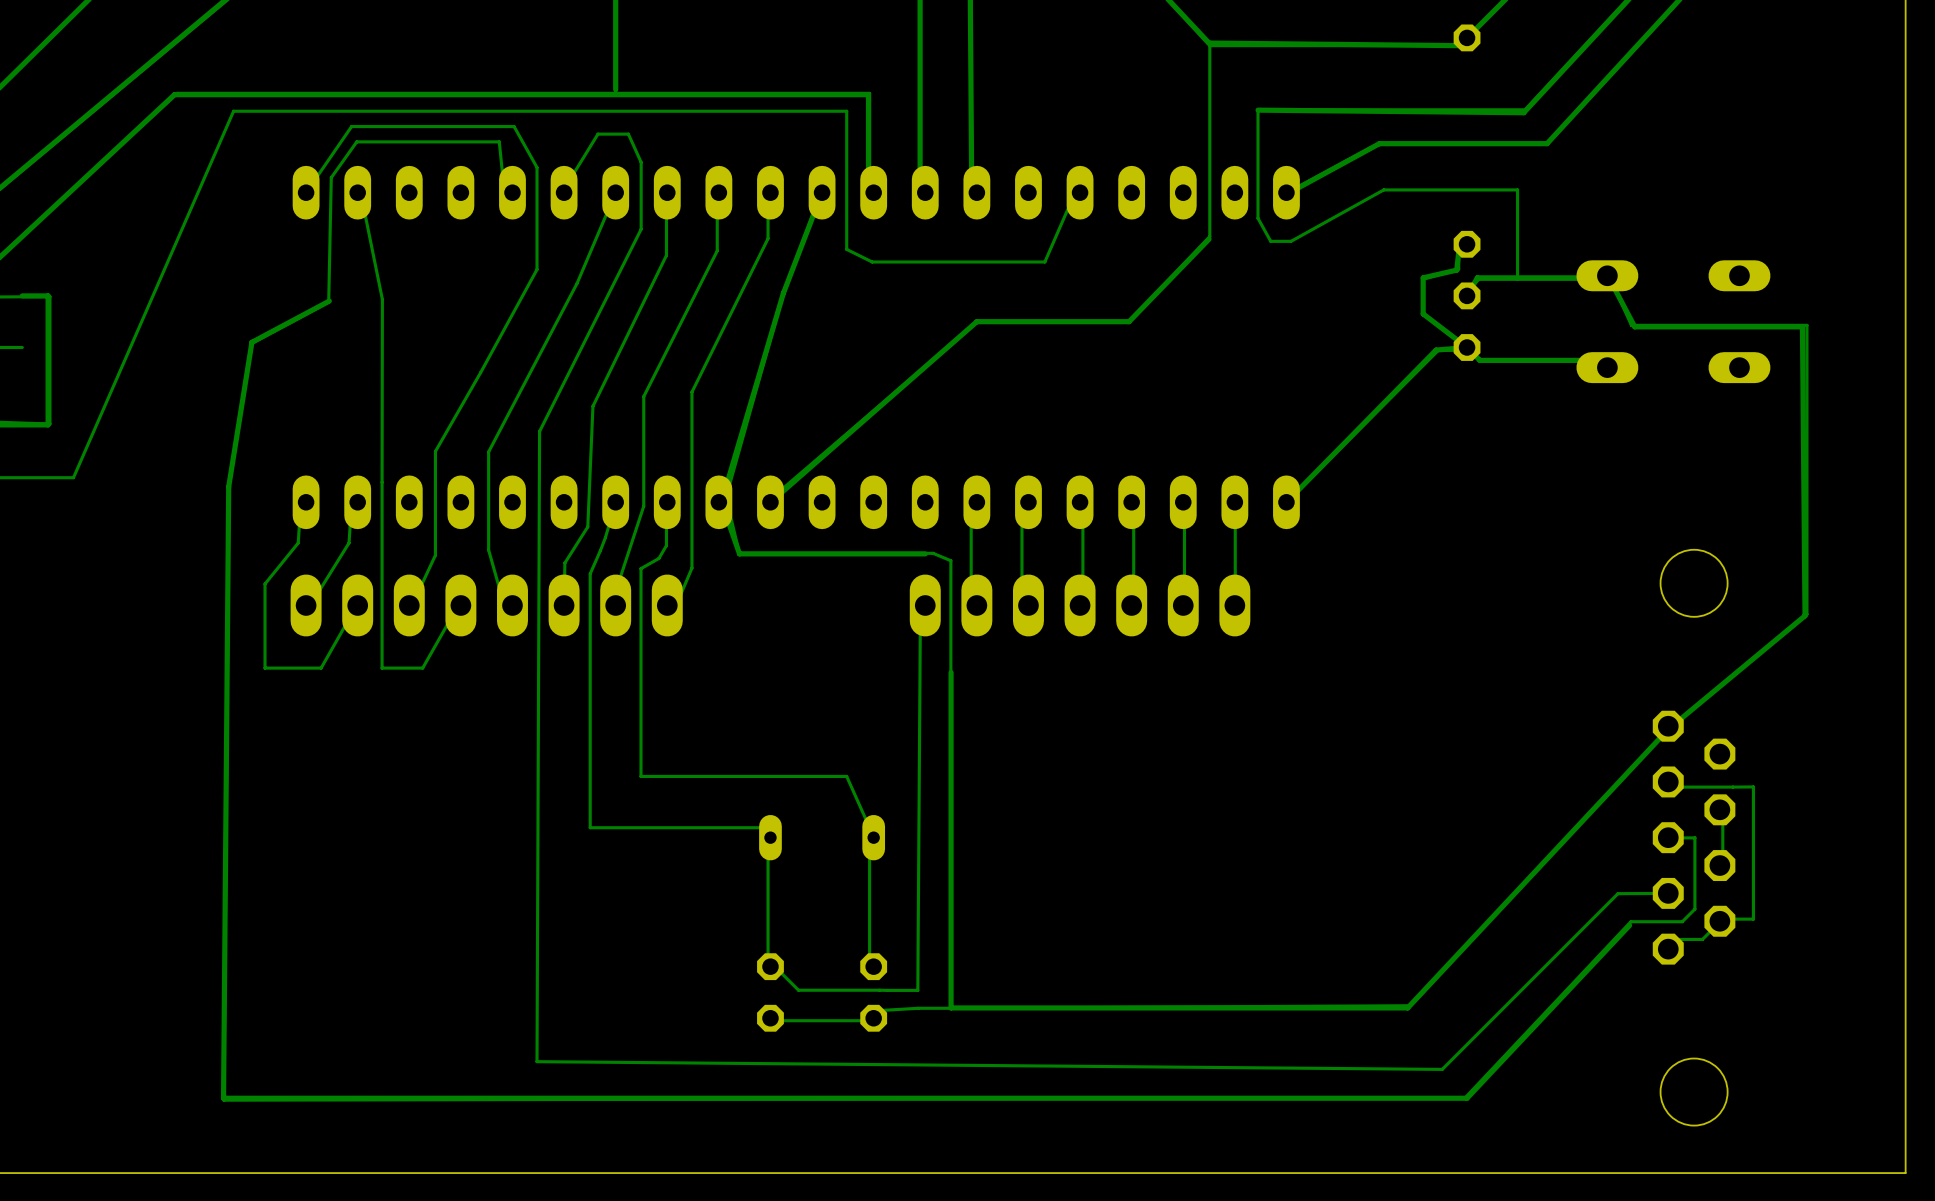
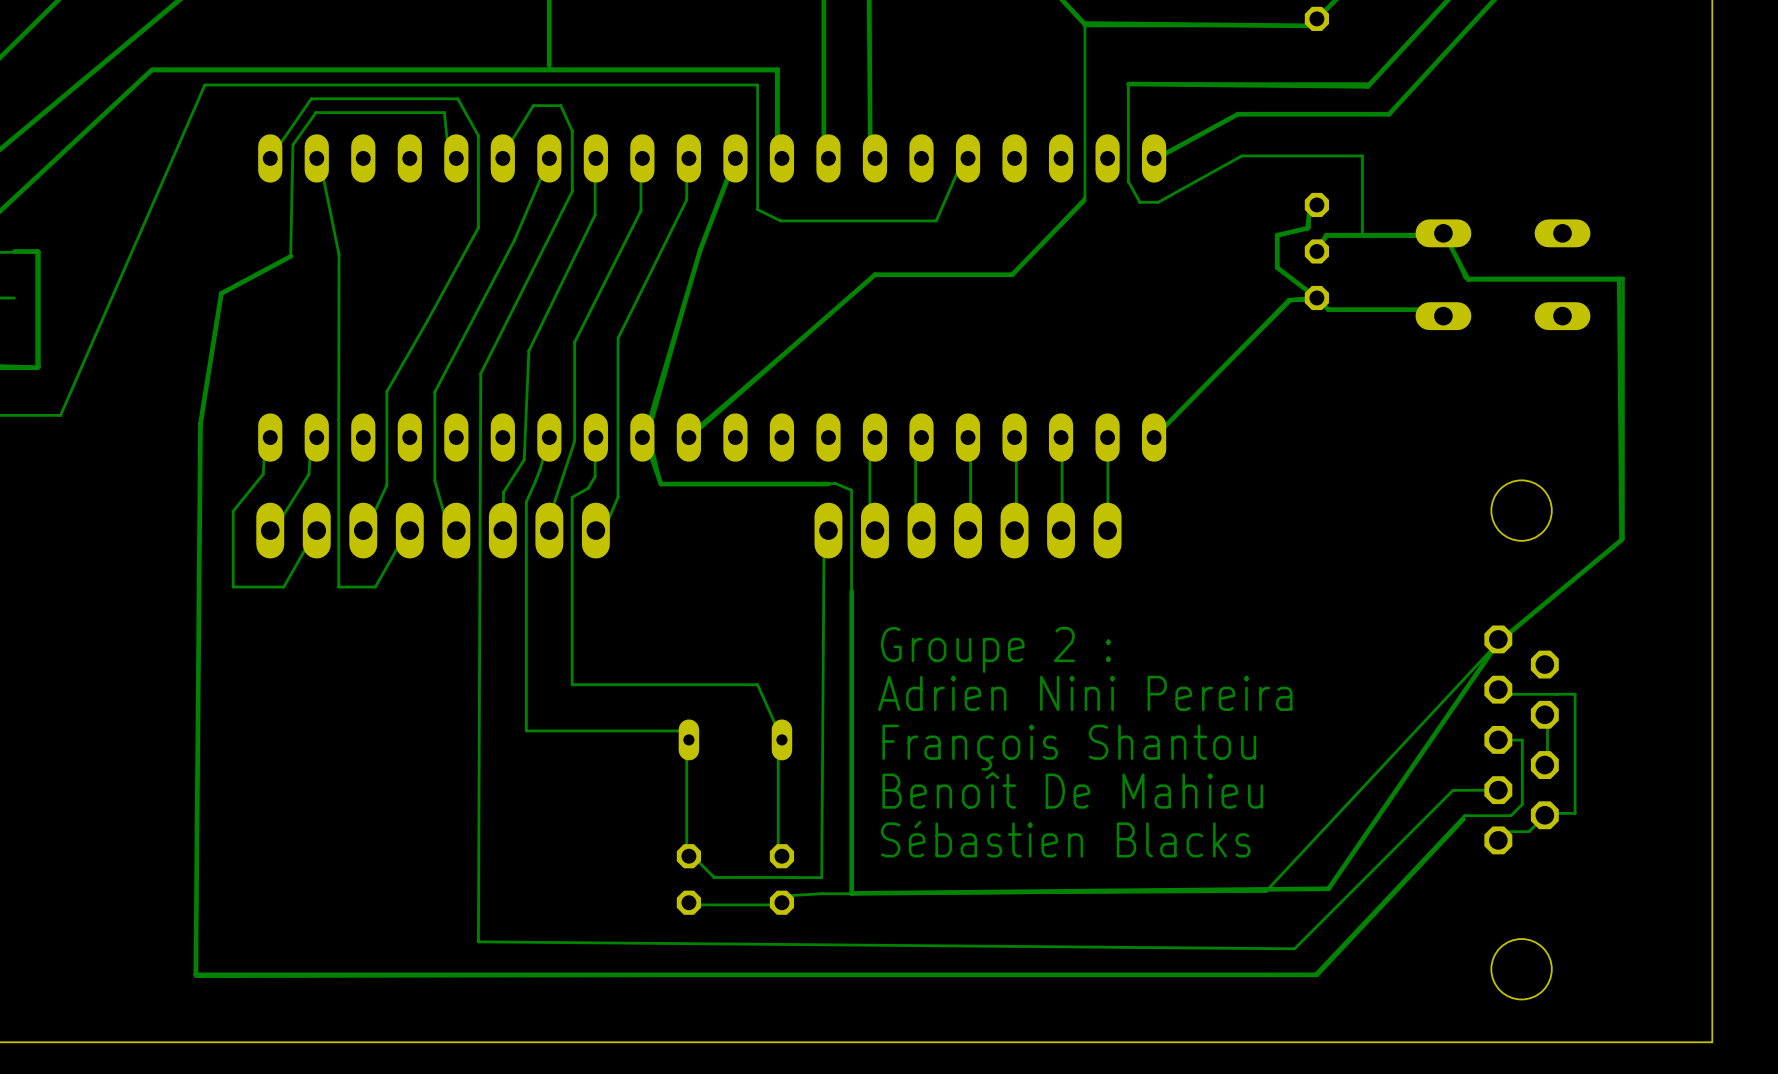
track: (1668, 729) (1407, 1007) (951, 1007) -> (1498, 642) (1328, 888) (851, 893)
text: none -> Groupe 2 : (996, 649)
text: none -> Adrien Nini Pereira (1085, 693)
text: none -> François Shantou (1069, 747)
text: none -> Benoît De Mahieu (1072, 790)
text: none -> Sébastien Blacks (1065, 839)

